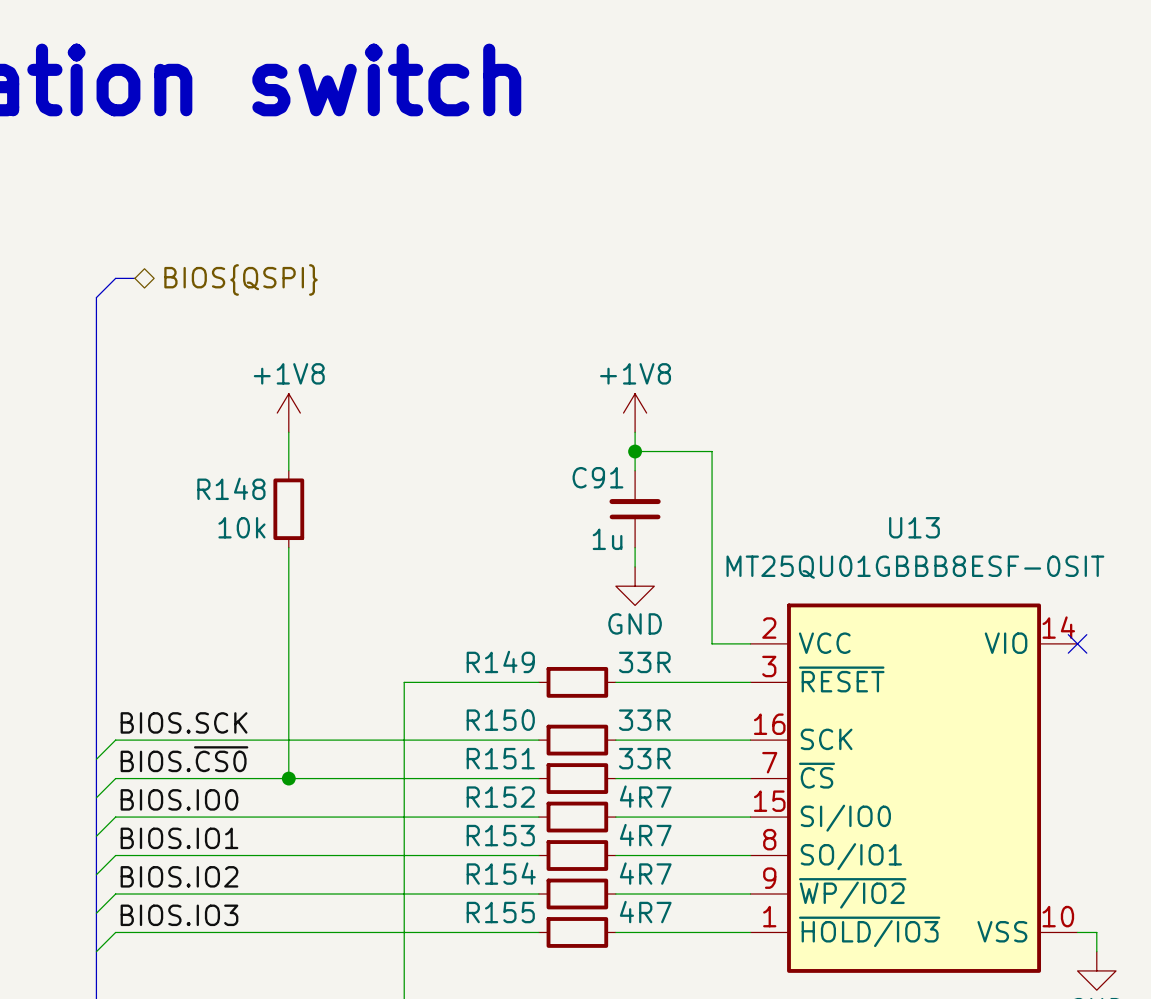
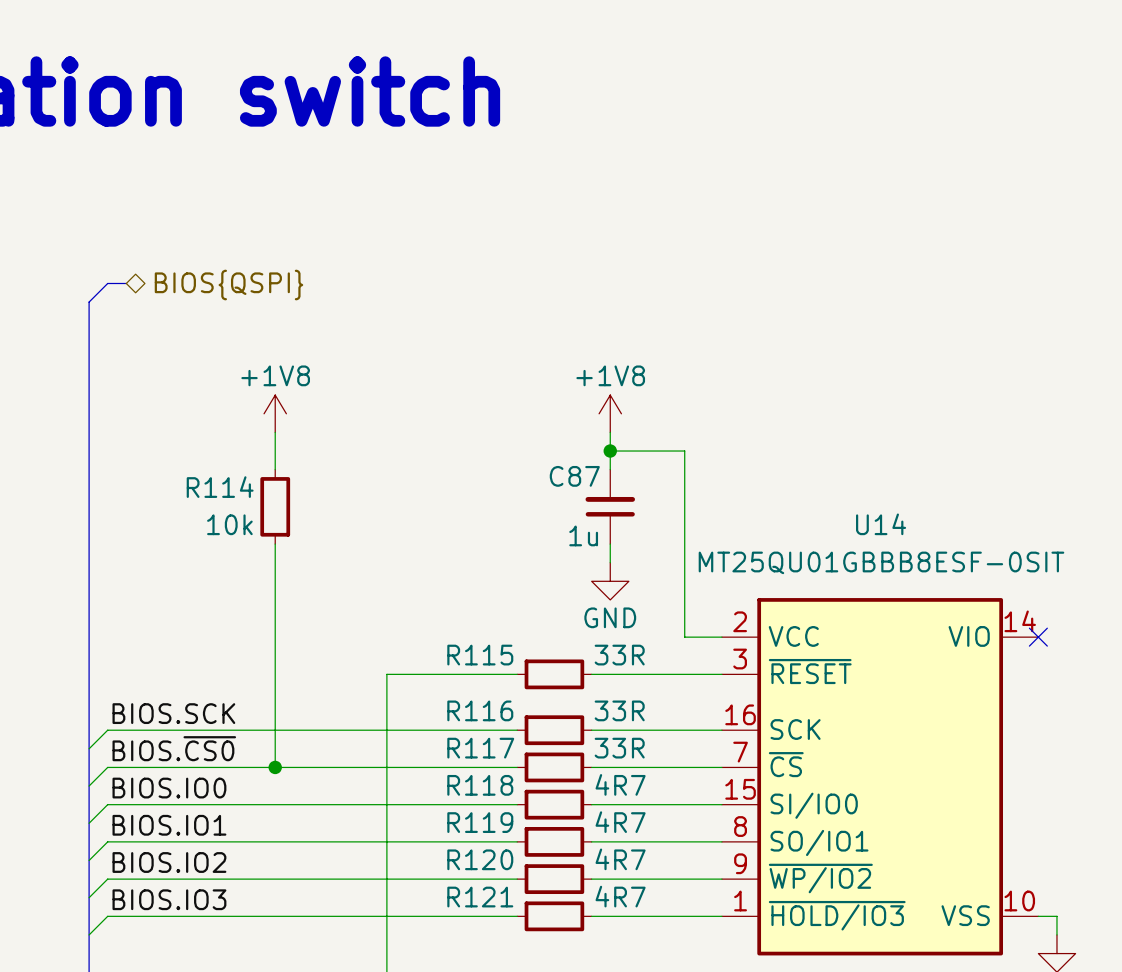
C91 name: C91 (597, 477) -> C87 (574, 476)
R148 name: R148 (231, 488) -> R114 (220, 487)
U13 name: U13 (914, 527) -> U14 (881, 524)
R149 name: R149 (500, 661) -> R115 (480, 655)
R150 name: R150 (500, 720) -> R116 (480, 710)
R151 name: R151 (500, 758) -> R117 (480, 748)
R152 name: R152 (500, 797) -> R118 (480, 785)
R153 name: R153 (500, 835) -> R119 (480, 822)
R154 name: R154 (501, 873) -> R120 (480, 859)
R155 name: R155 (500, 912) -> R121 (480, 897)

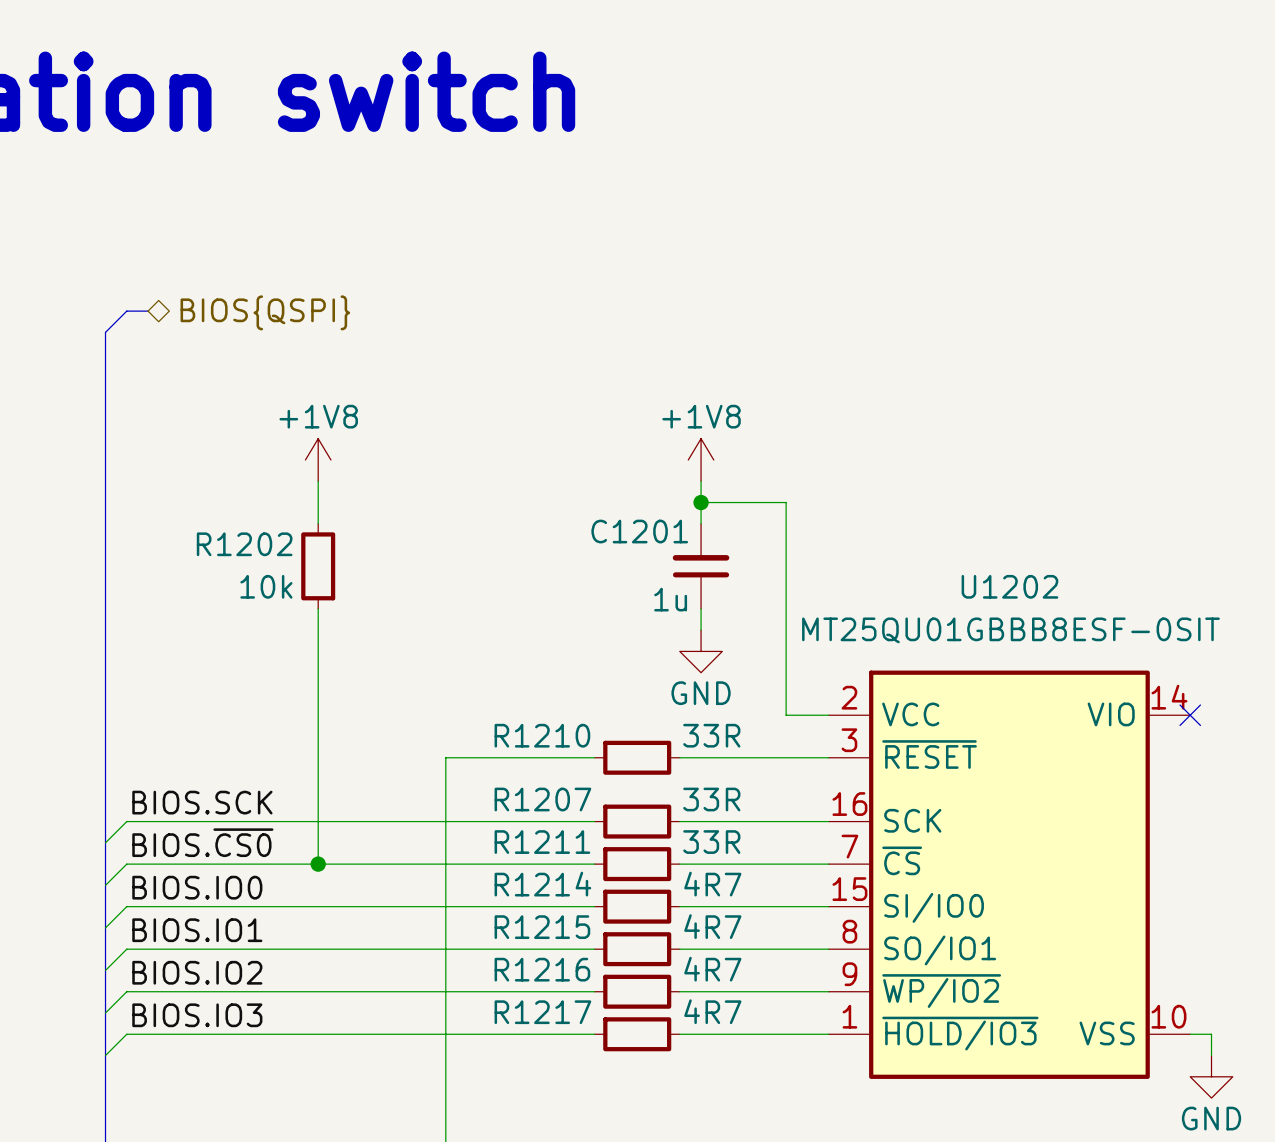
C87 name: C87 (574, 476) -> C1201 (639, 531)
R114 name: R114 (220, 487) -> R1202 (244, 544)
U14 name: U14 (881, 524) -> U1202 (1009, 586)
R115 name: R115 (480, 655) -> R1210 (542, 735)
R116 name: R116 (480, 710) -> R1207 (542, 799)
R117 name: R117 (480, 748) -> R1211 (542, 842)
R118 name: R118 (480, 785) -> R1214 (542, 884)
R119 name: R119 (480, 822) -> R1215 (542, 927)
R120 name: R120 (480, 859) -> R1216 (542, 969)
R121 name: R121 (480, 897) -> R1217 (542, 1012)

